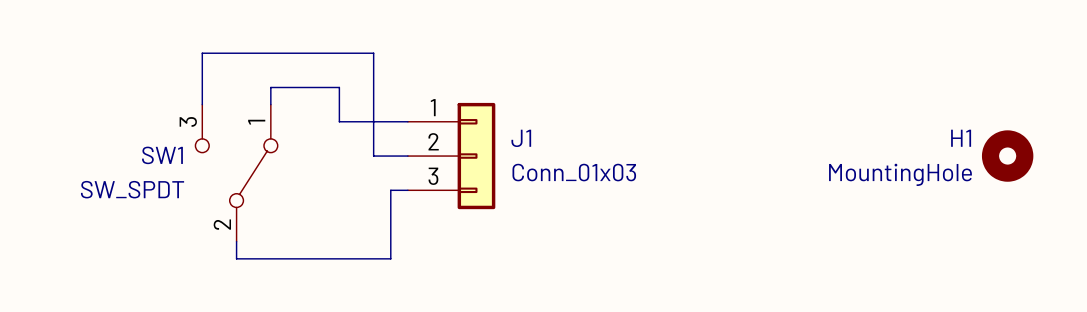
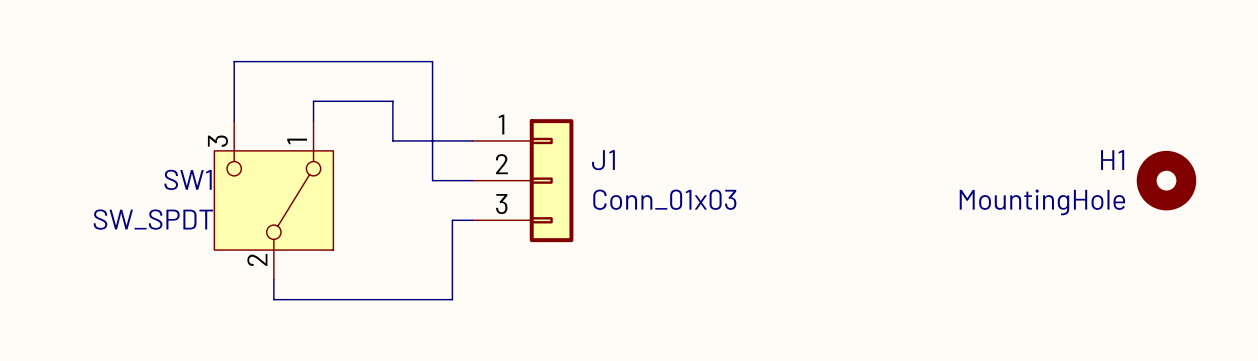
SW1 symbol: [195, 104, 278, 242] -> [214, 121, 334, 280]

